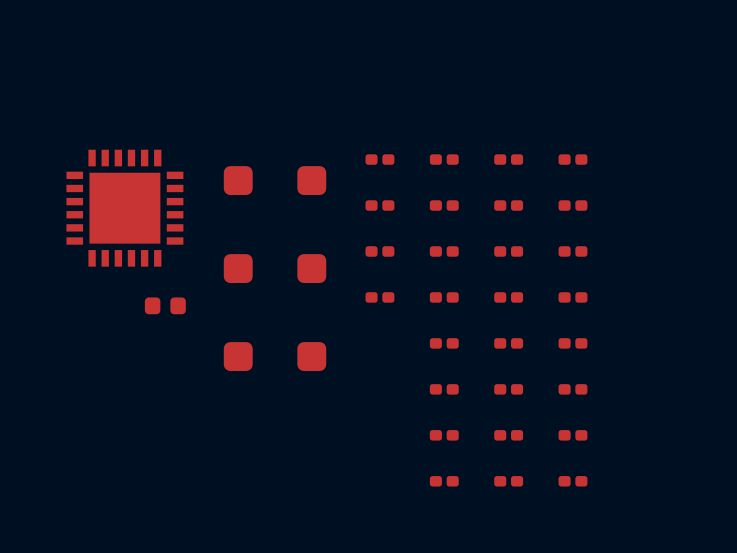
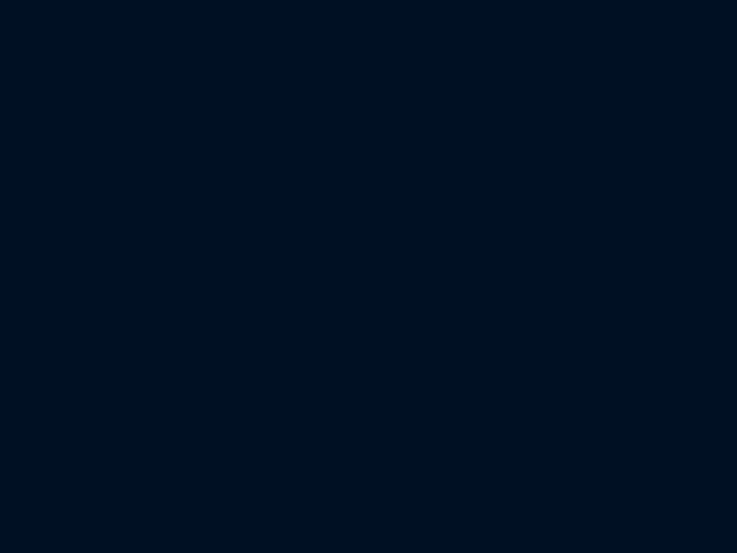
part: (379, 159) -> none
part: (444, 159) -> none
part: (508, 159) -> none
part: (572, 159) -> none
part: (275, 180) -> none
part: (379, 205) -> none
part: (444, 205) -> none
part: (508, 205) -> none
part: (572, 205) -> none
part: (124, 208) -> none
part: (379, 251) -> none
part: (444, 251) -> none
part: (508, 251) -> none
part: (572, 251) -> none
part: (275, 268) -> none
part: (379, 297) -> none
part: (444, 297) -> none
part: (508, 297) -> none
part: (572, 297) -> none
part: (165, 305) -> none
part: (444, 343) -> none
part: (508, 343) -> none
part: (572, 343) -> none
part: (275, 356) -> none
part: (444, 389) -> none
part: (508, 389) -> none
part: (572, 389) -> none
part: (444, 435) -> none
part: (508, 435) -> none
part: (572, 435) -> none
part: (444, 481) -> none
part: (508, 481) -> none
part: (572, 481) -> none

